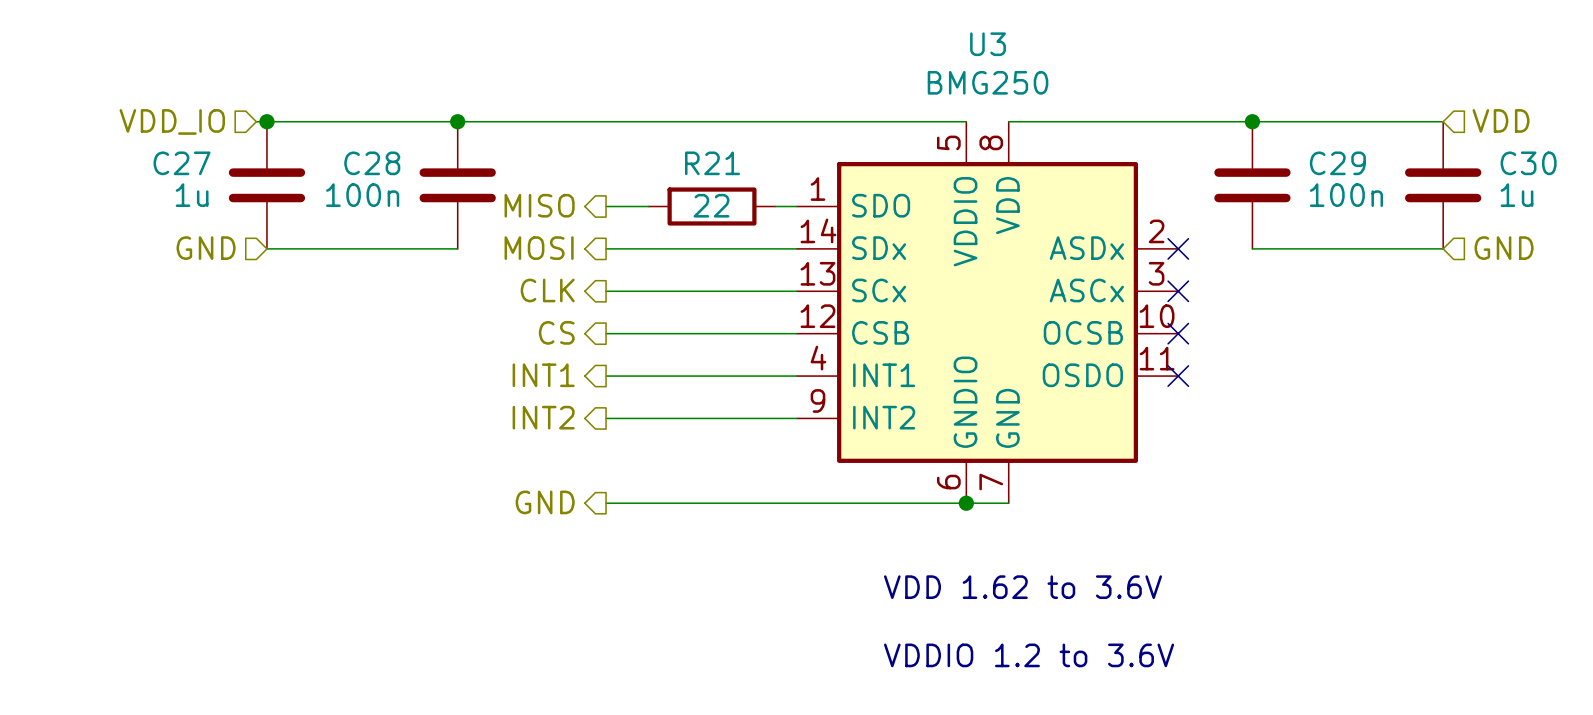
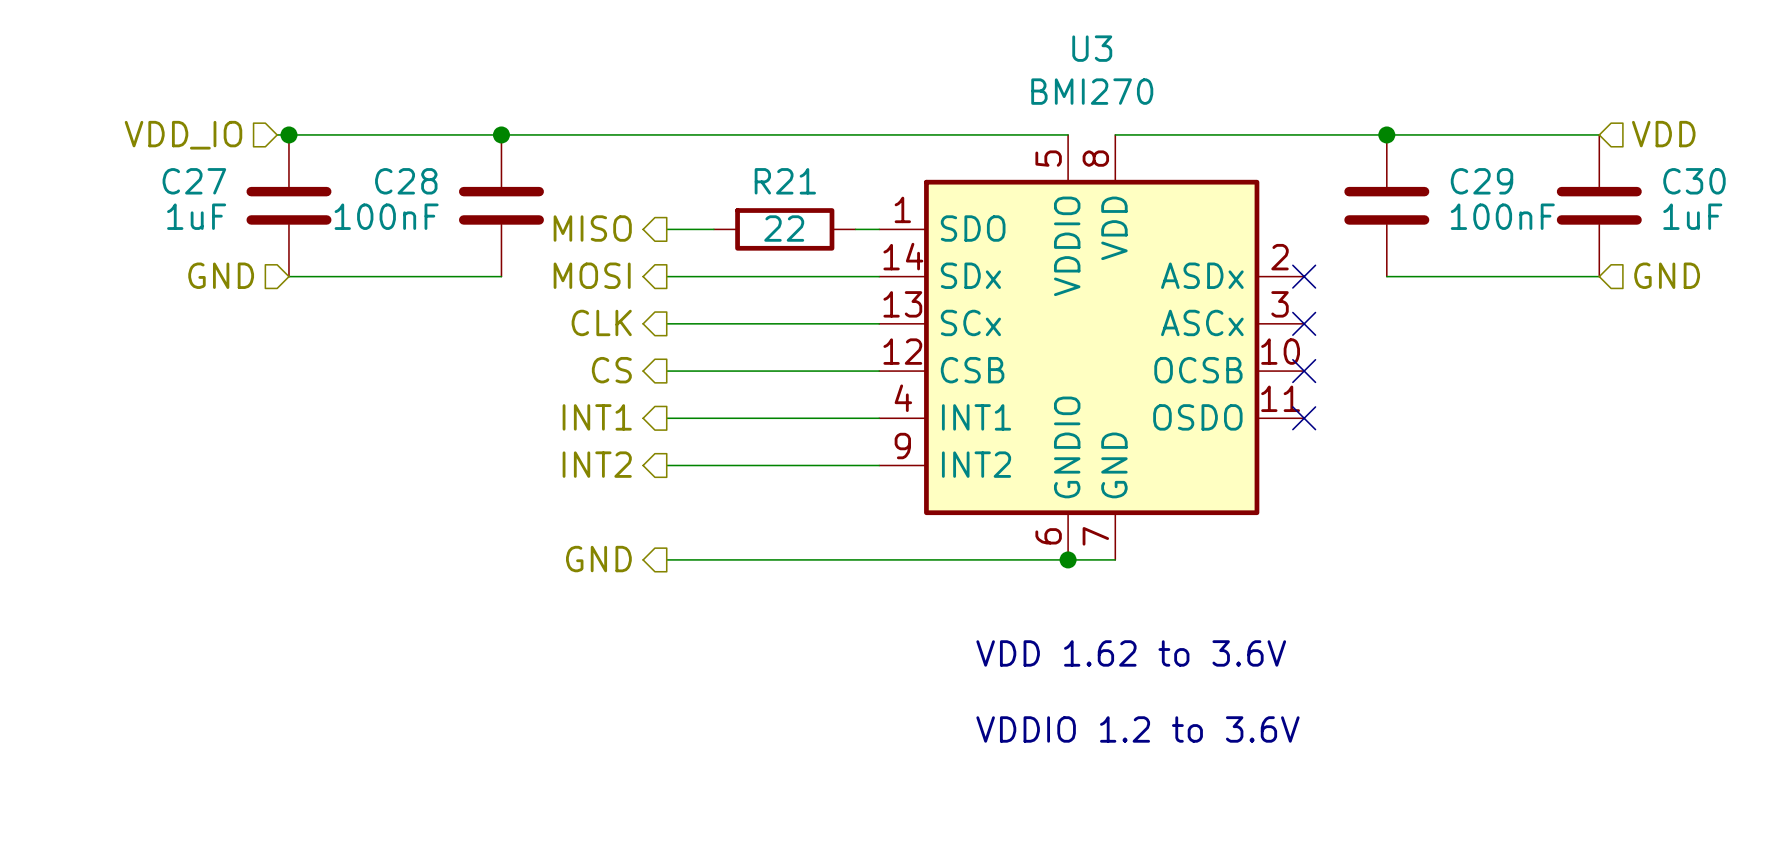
U3 value: BMG250 (988, 82) -> BMI270 (1092, 91)
C27 value: 1u (192, 195) -> 1uF (196, 216)
C28 value: 100n (362, 195) -> 100nF (386, 216)
C29 value: 100n (1346, 195) -> 100nF (1502, 216)
C30 value: 1u (1517, 195) -> 1uF (1692, 216)

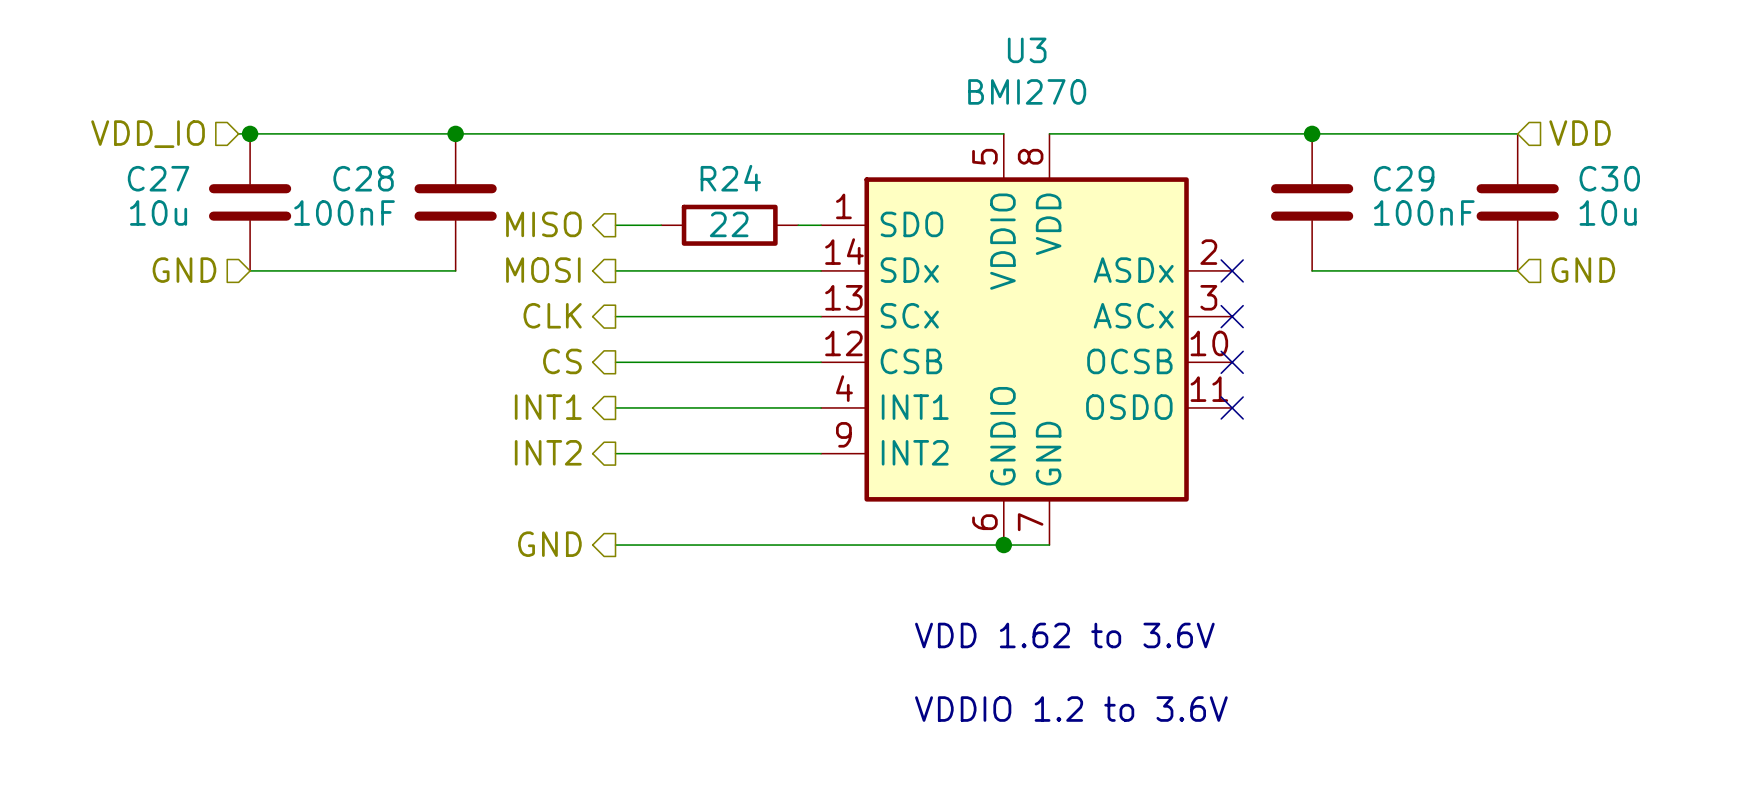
R21 name: R21 (785, 181) -> R24 (730, 178)
C27 value: 1uF (196, 216) -> 10u (158, 212)
C30 value: 1uF (1692, 216) -> 10u (1608, 212)

